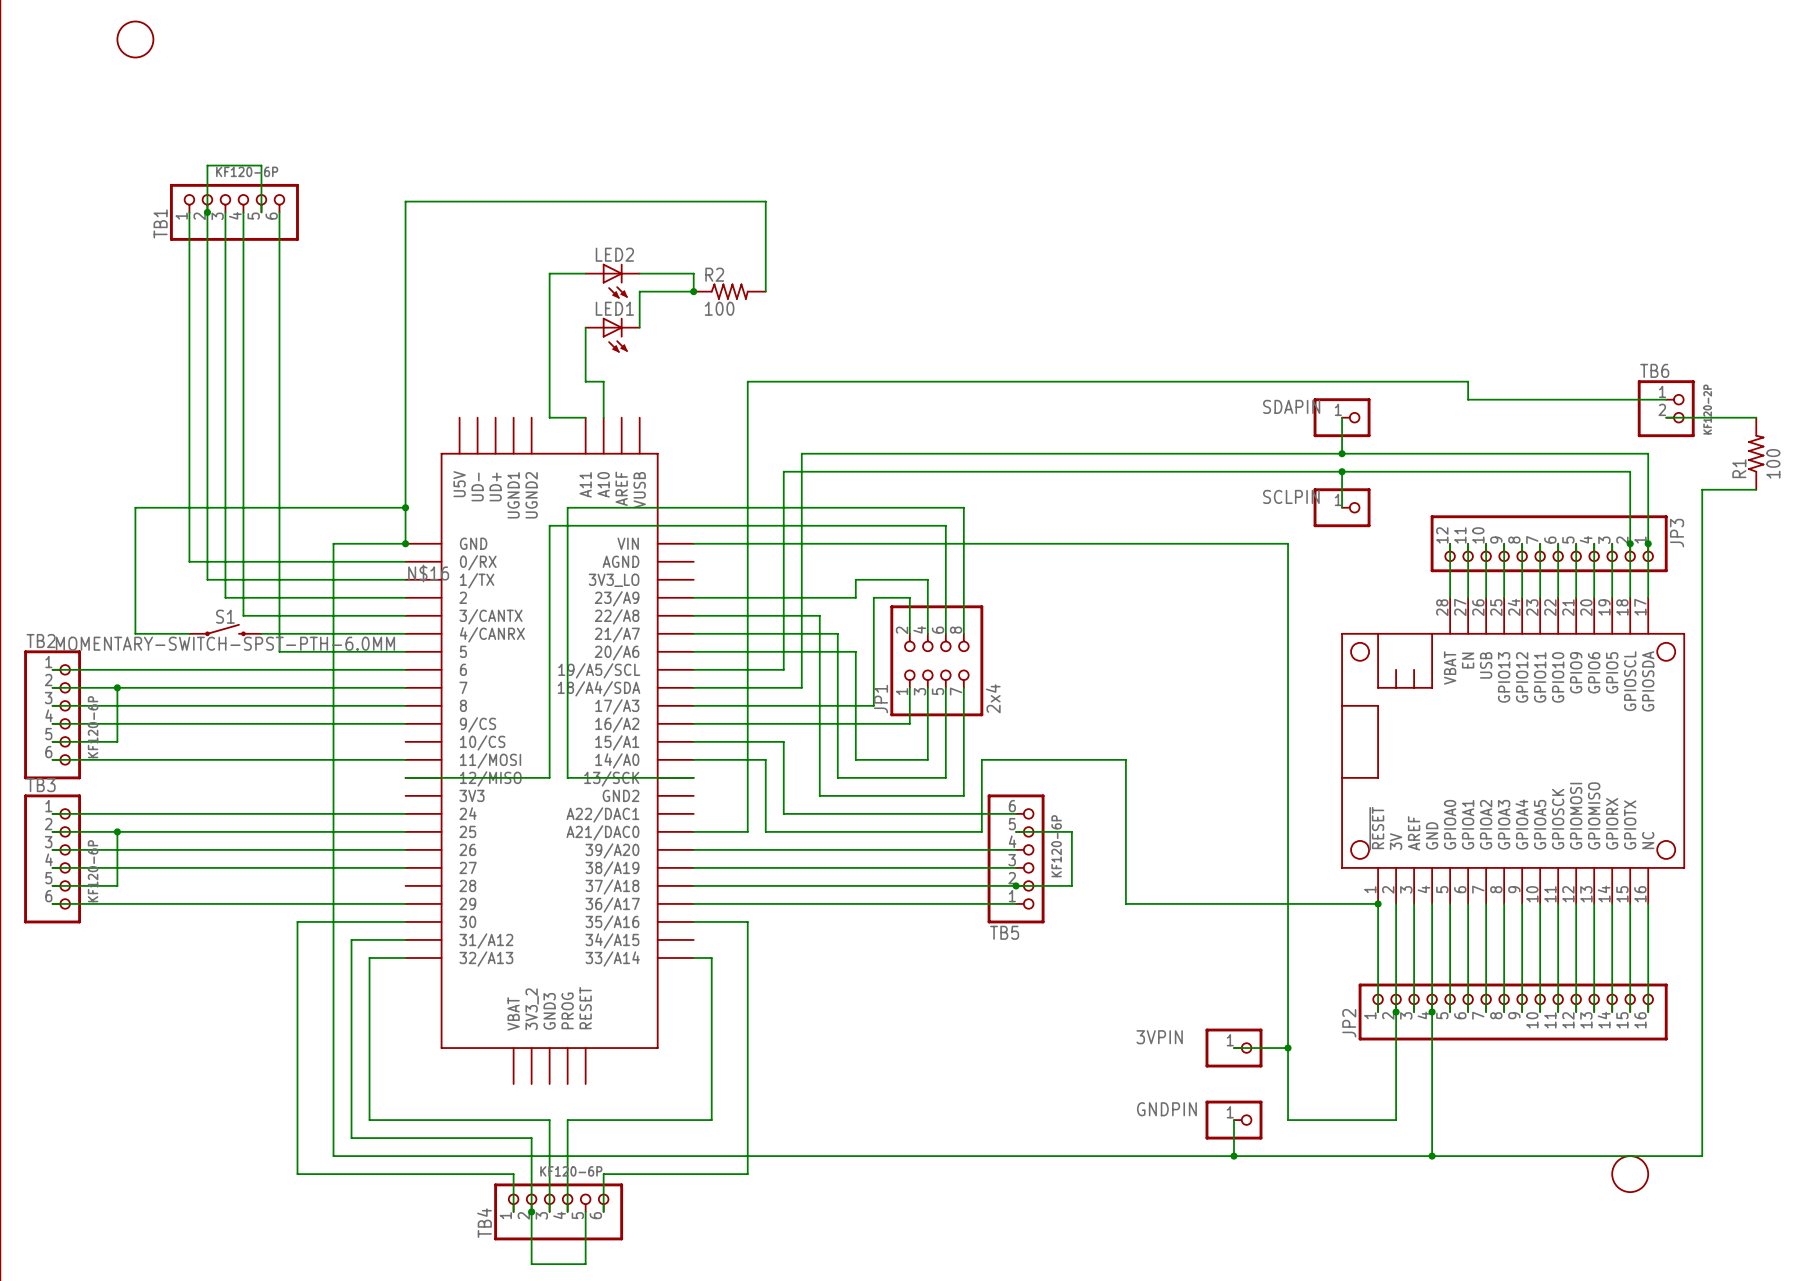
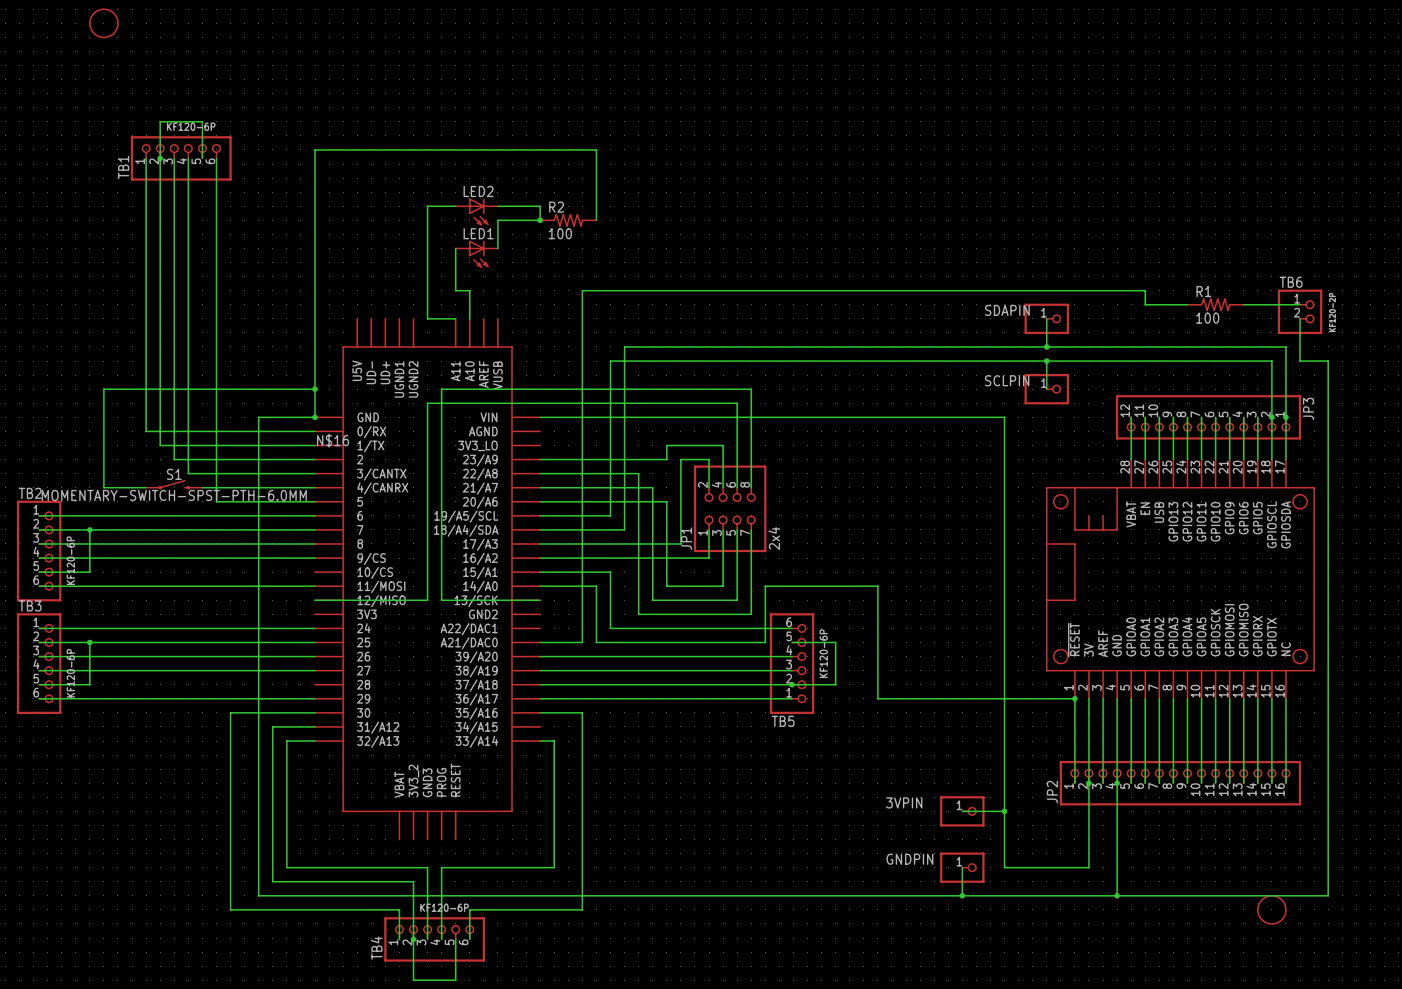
wire: (1666, 417) (1756, 417) -> (1300, 318) (1300, 361) (1328, 361) (1328, 375)
R1 rotation: 0° (1756, 453) -> 90° clockwise (1215, 304)
R1 position: (1756, 453) -> (1215, 304)
wire: (1702, 489) (1756, 489) -> none

